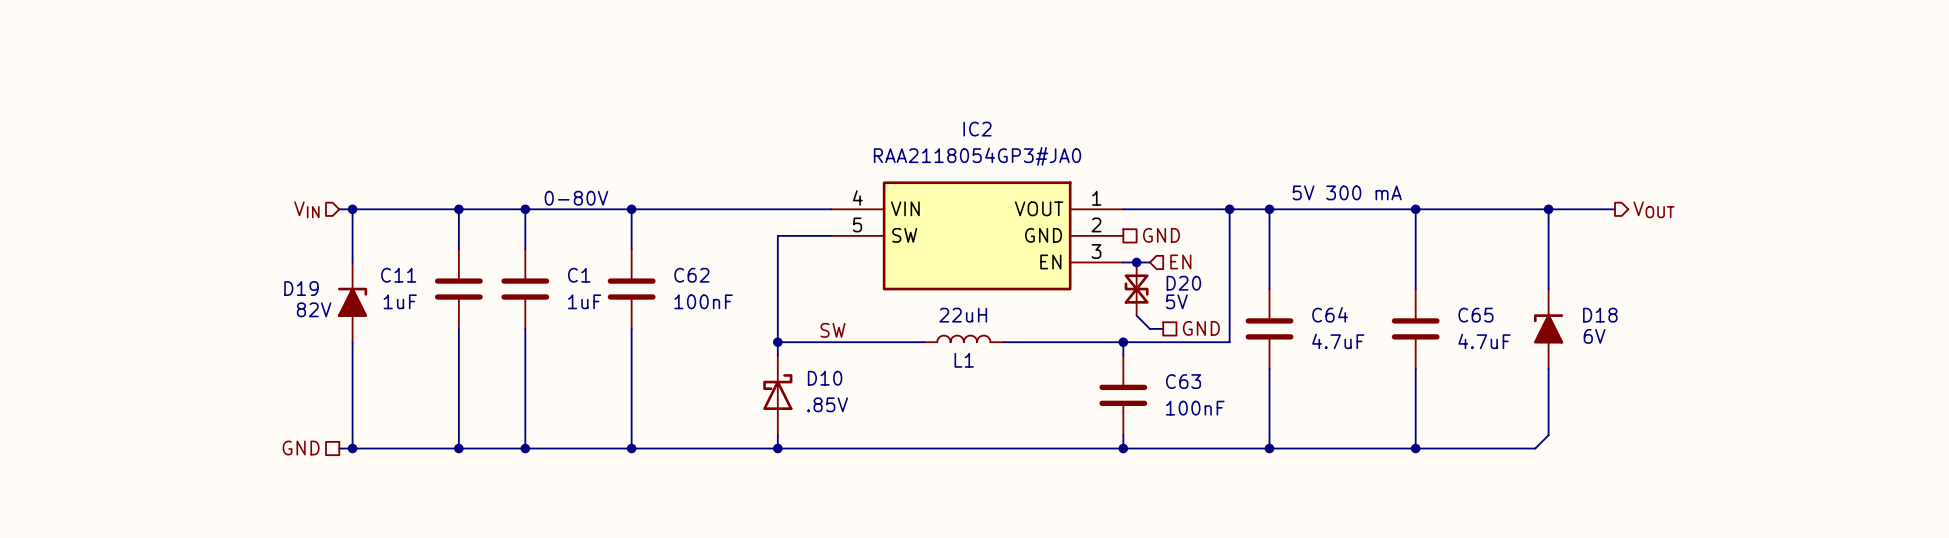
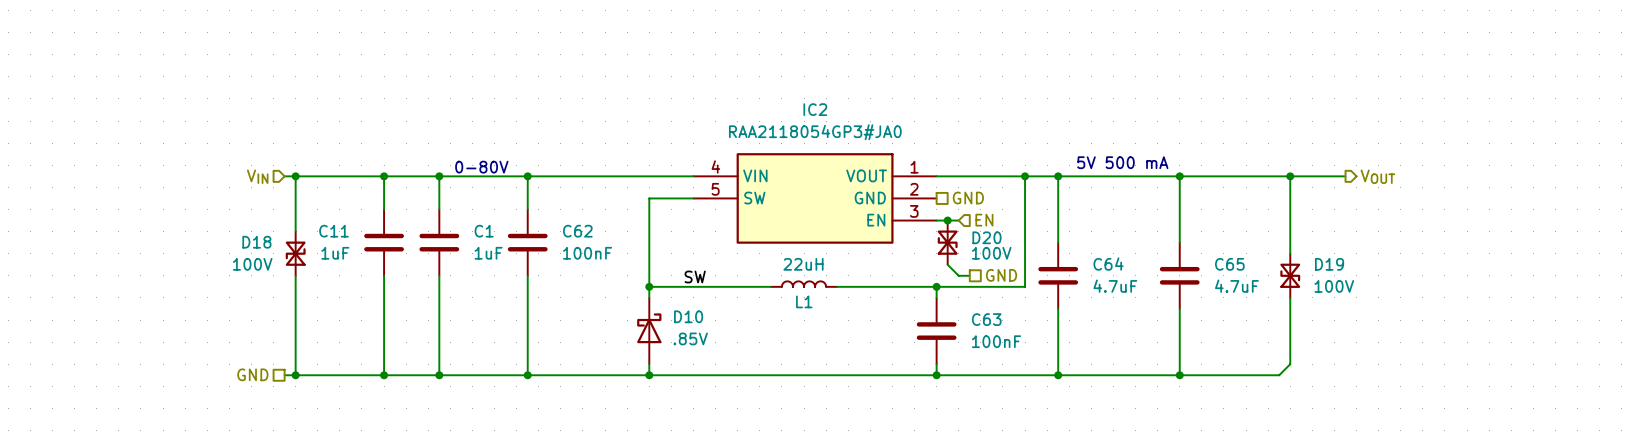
text: 5V 300 mA (1347, 192) -> 5V 500 mA (1122, 162)
D19 symbol: [337, 262, 368, 343] -> [1280, 253, 1301, 298]
D19 name position: D19 (301, 288) -> D19 (1329, 264)
D18 symbol: [1533, 289, 1564, 369] -> [285, 231, 306, 276]
D20 value: 5V (1176, 301) -> 100V (991, 253)
D19 value: 82V (314, 309) -> 100V (1334, 286)
D18 name position: D18 (1600, 315) -> D18 (256, 242)
D18 value: 6V (1594, 336) -> 100V (252, 264)

